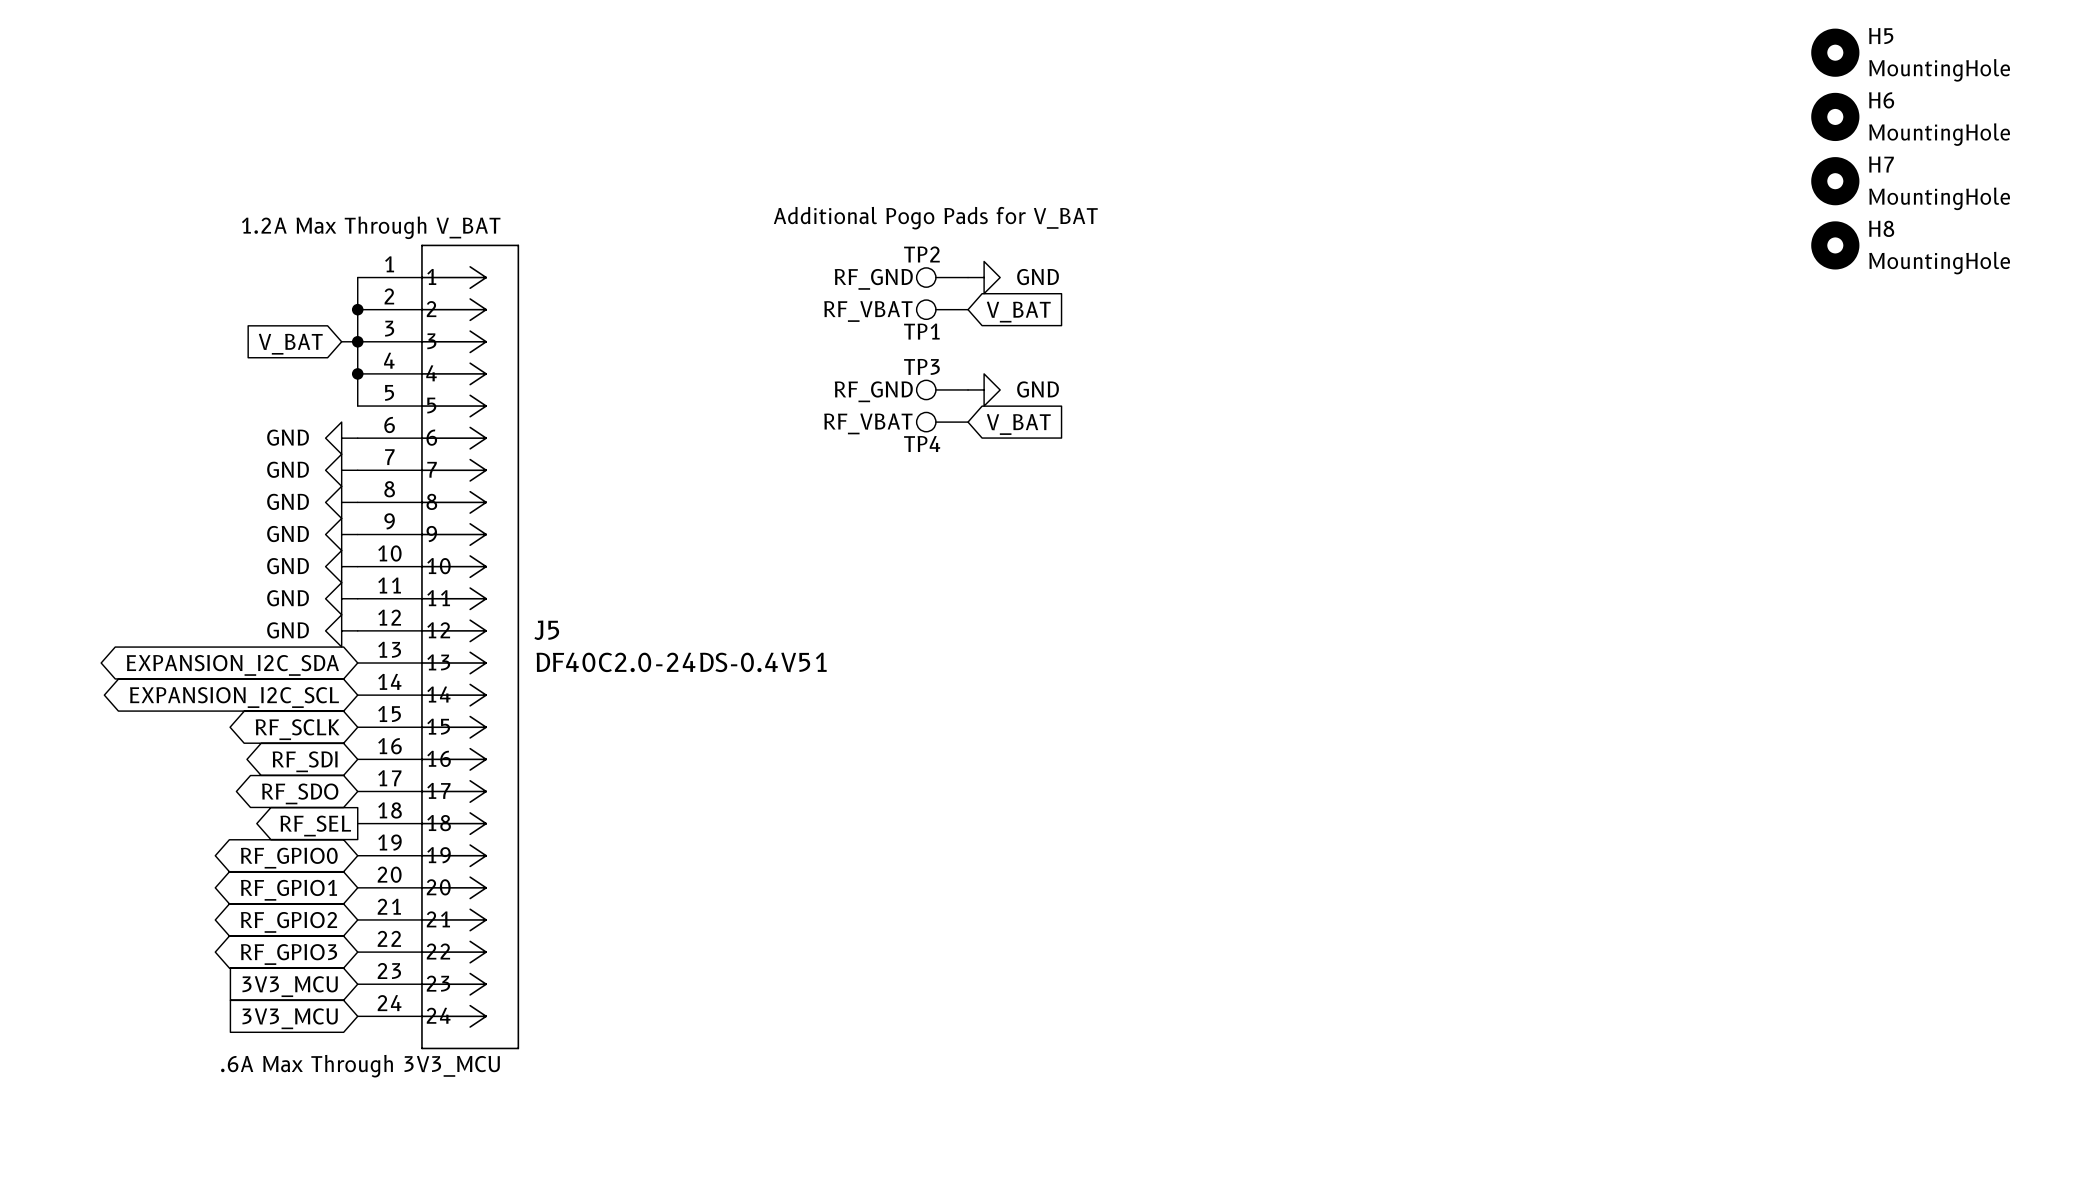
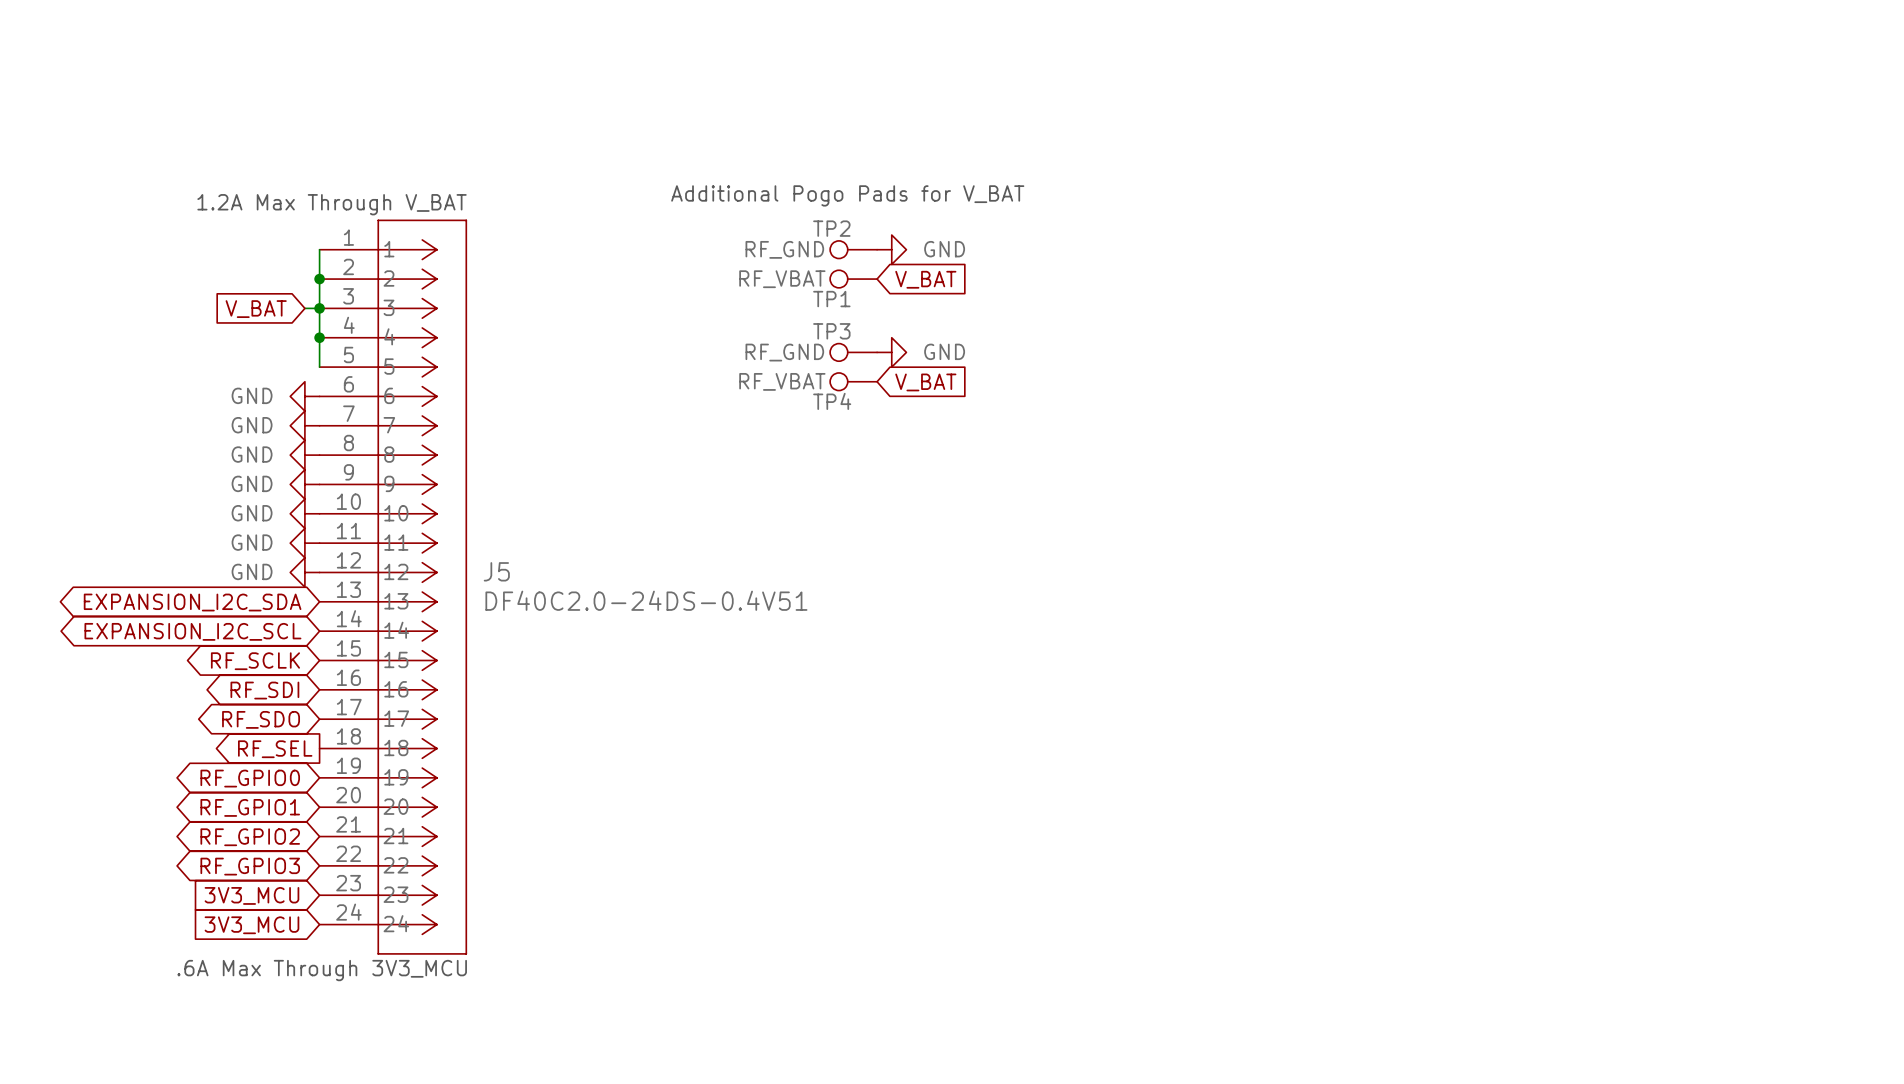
H5: MountingHole (1835, 52) -> none
H6: MountingHole (1835, 116) -> none
H7: MountingHole (1835, 181) -> none
H8: MountingHole (1835, 245) -> none

